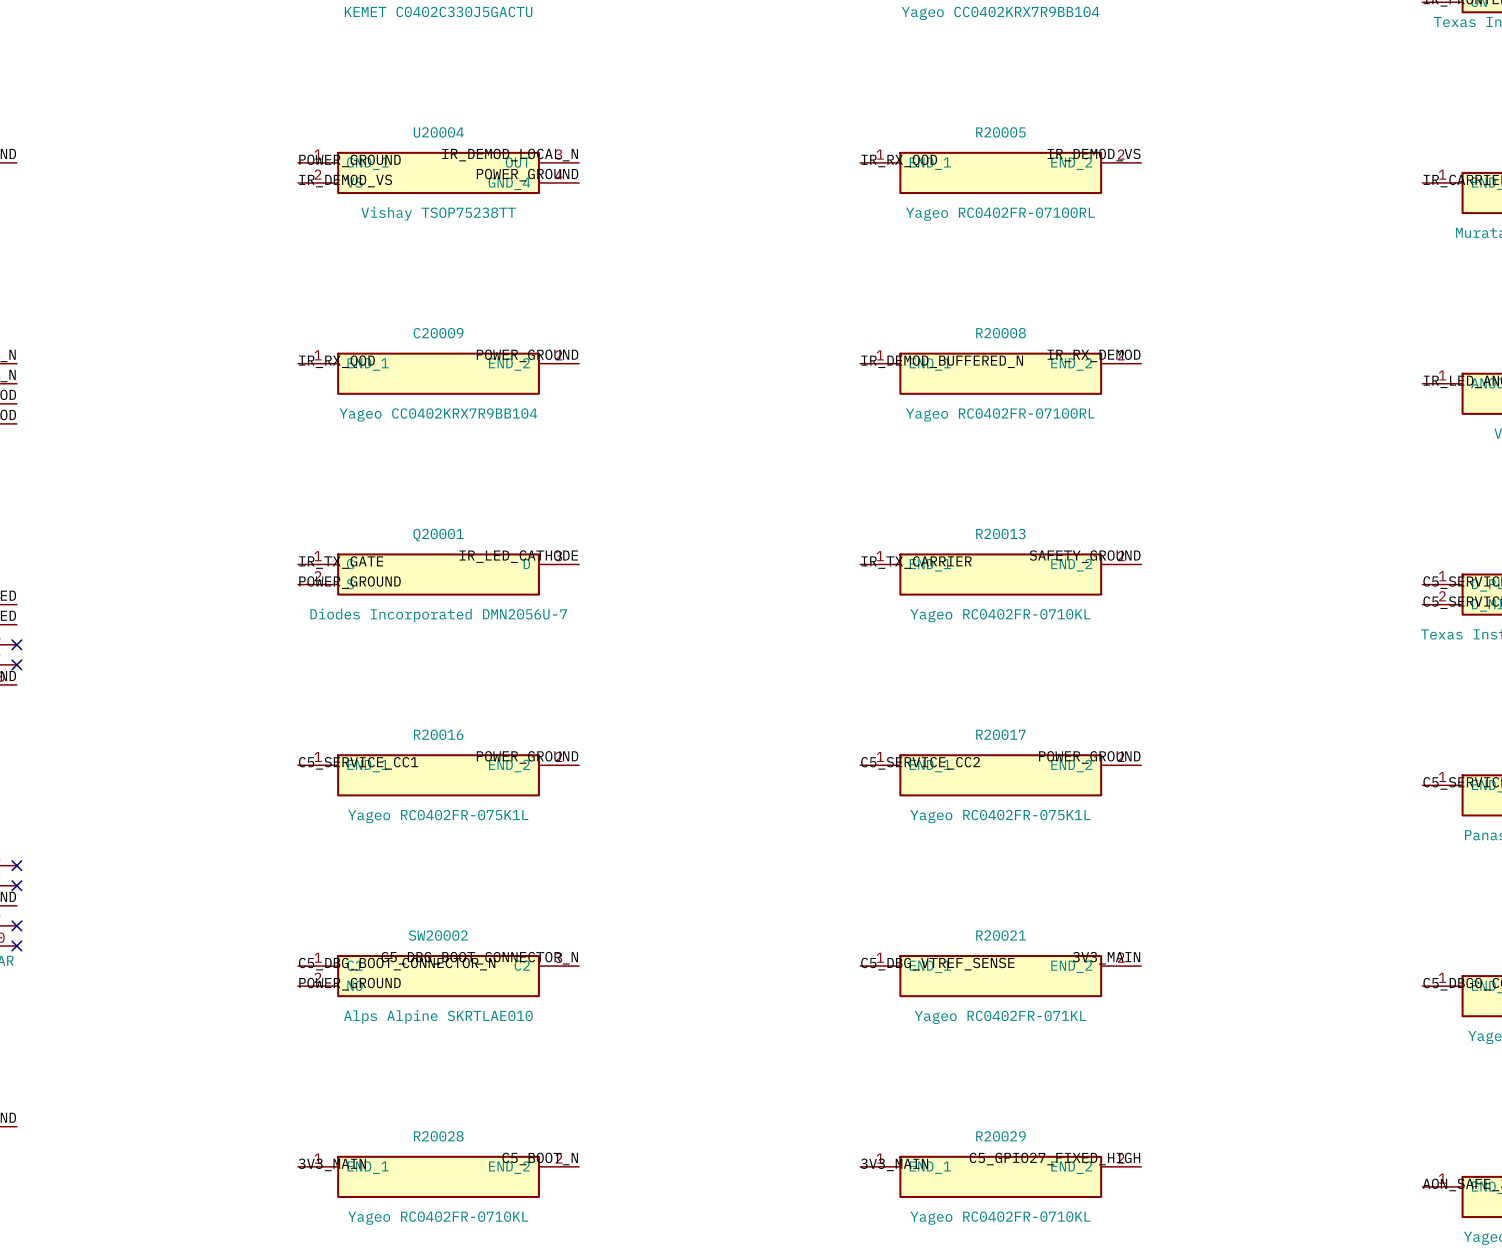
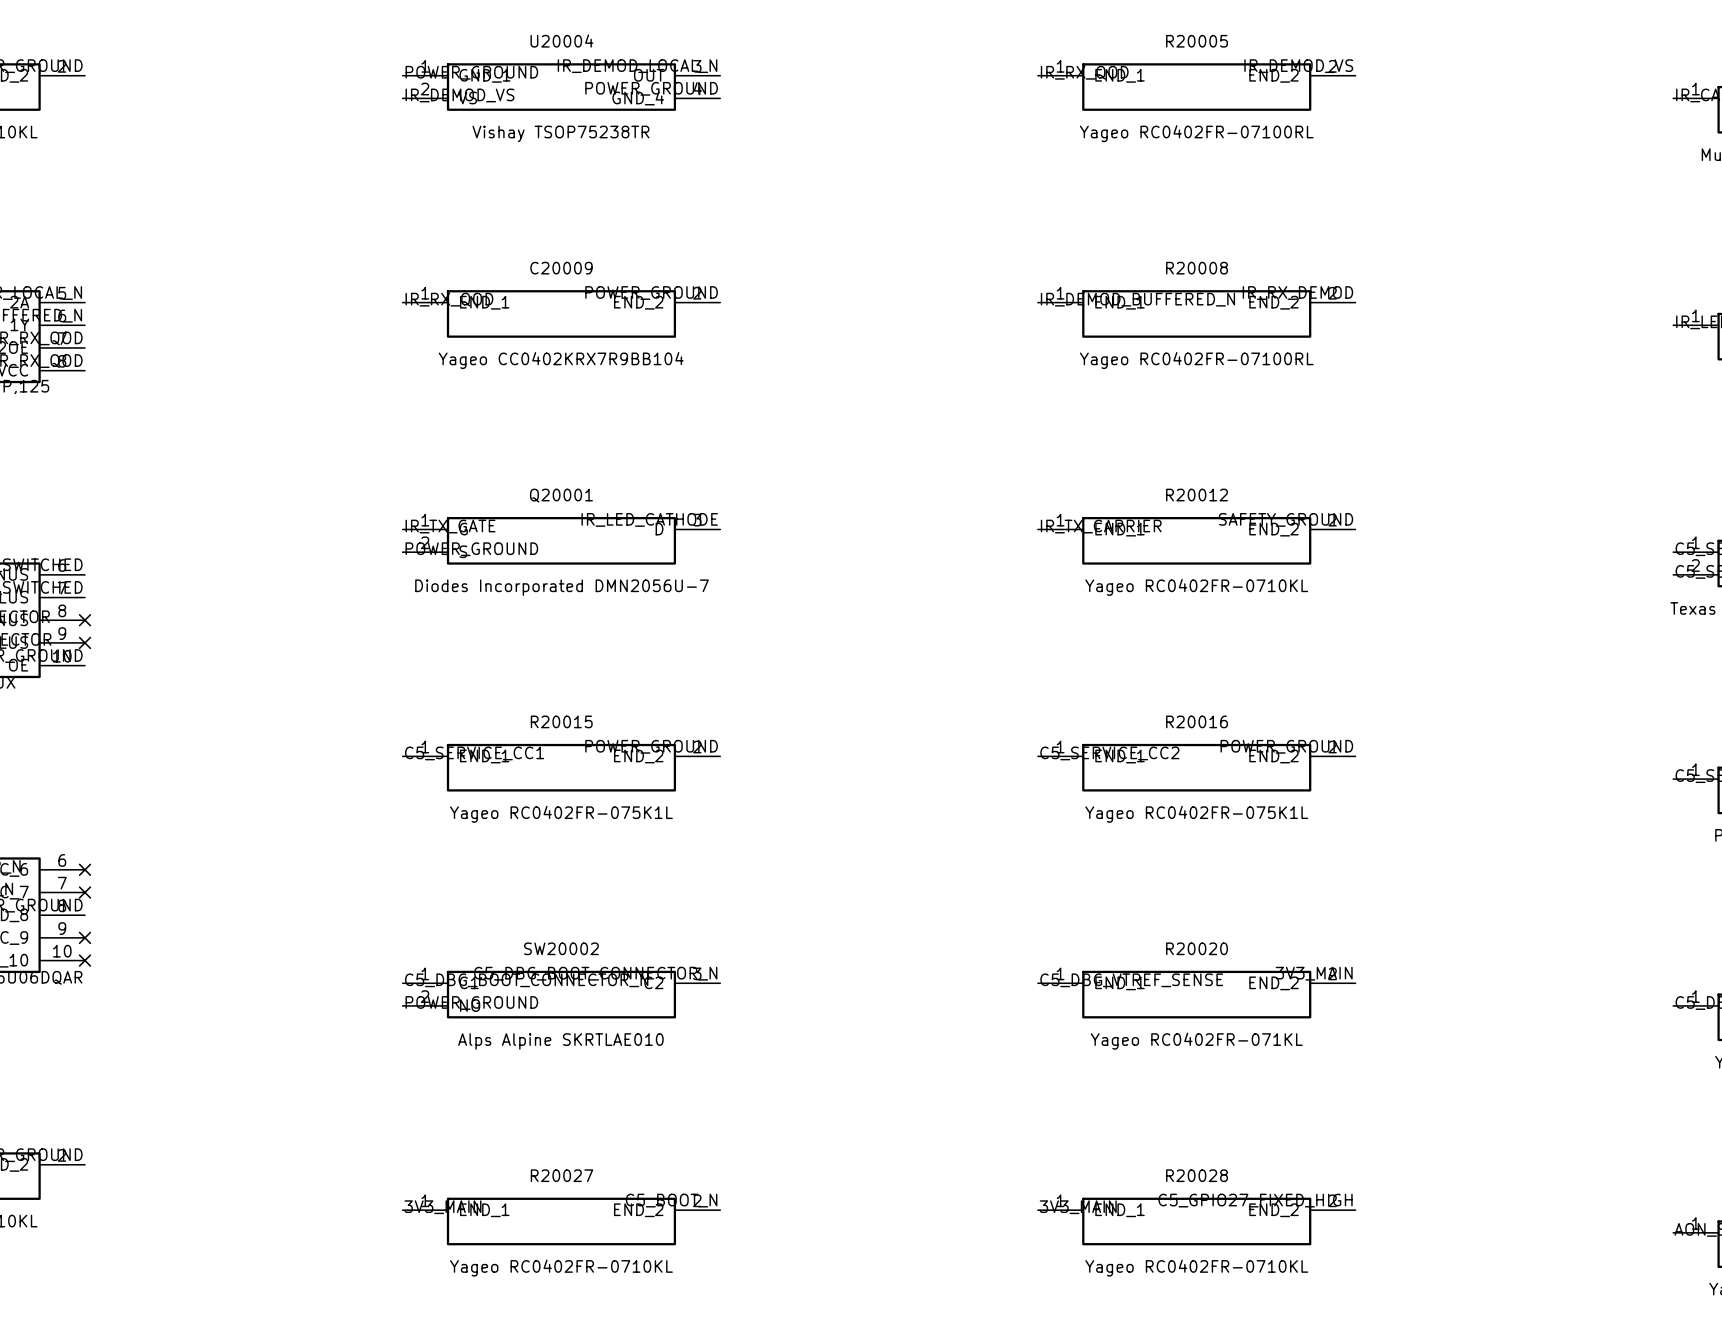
U20004 value: Vishay TSOP75238TT (438, 213) -> Vishay TSOP75238TR (560, 133)
R20013 name: R20013 (1000, 533) -> R20012 (1197, 495)
R20016 name: R20016 (438, 734) -> R20015 (561, 721)
R20017 name: R20017 (1000, 734) -> R20016 (1197, 721)
R20021 name: R20021 (1001, 935) -> R20020 (1197, 948)
R20028 name: R20028 (438, 1136) -> R20027 (561, 1175)
R20029 name: R20029 (1000, 1136) -> R20028 (1197, 1175)

